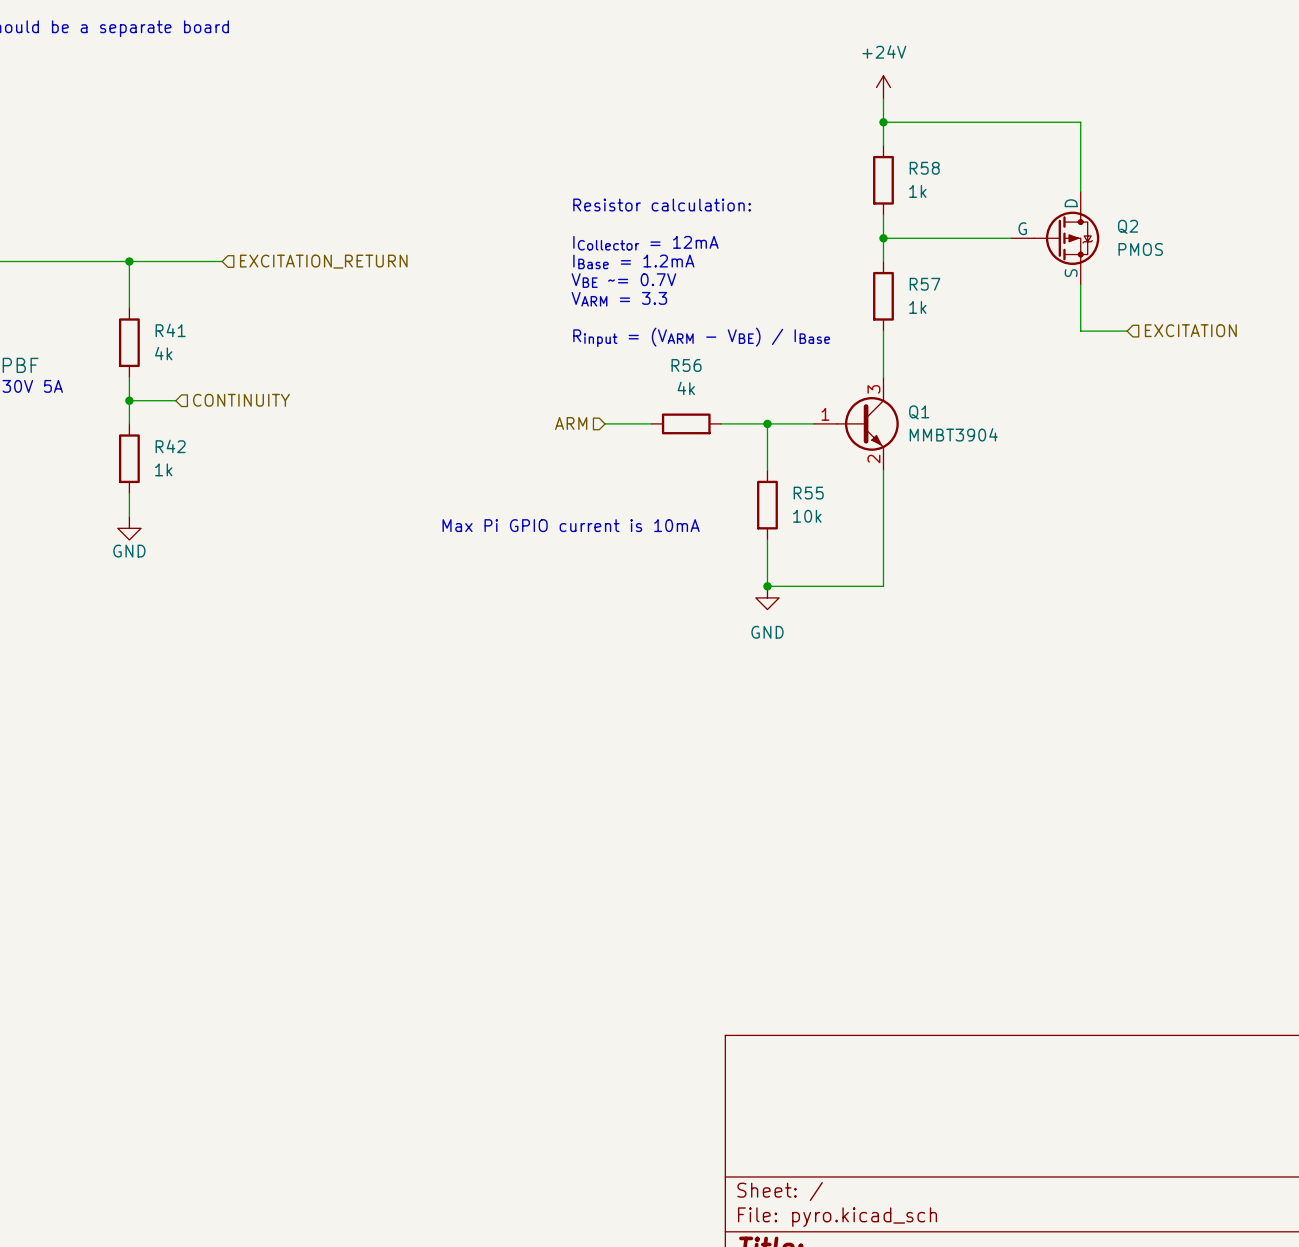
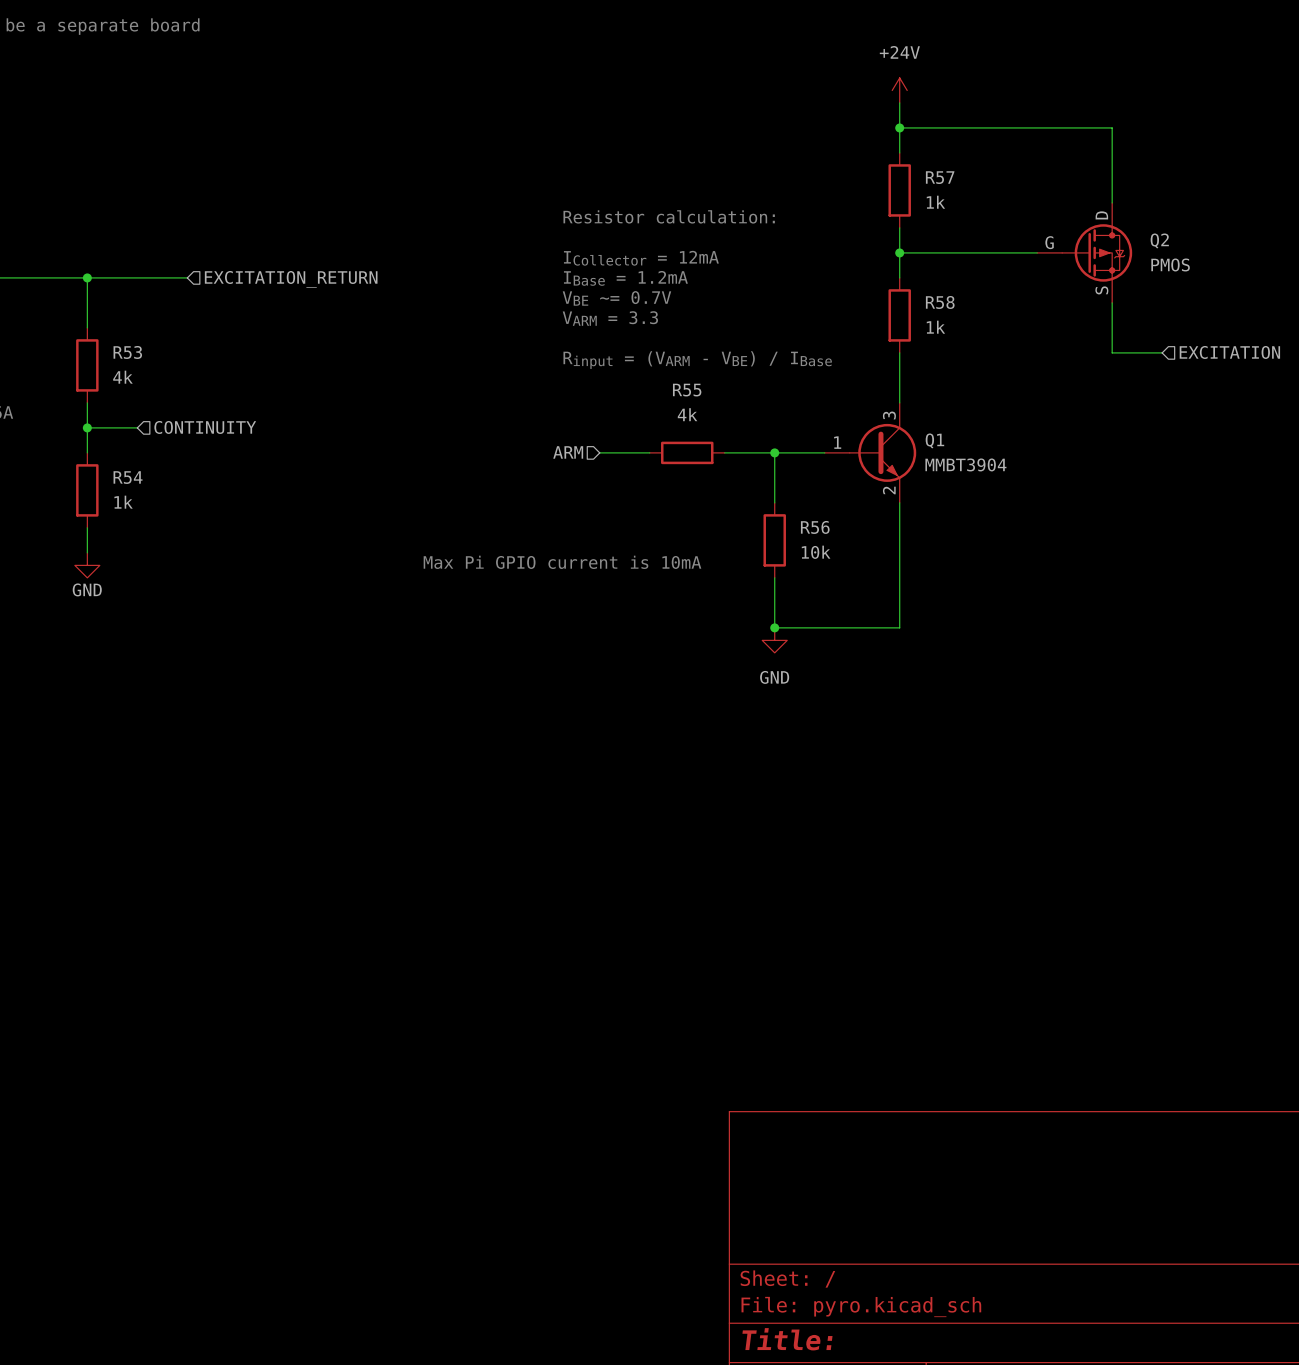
R58 name: R58 (924, 168) -> R57 (940, 177)
R57 name: R57 (925, 284) -> R58 (940, 302)
R41 name: R41 (170, 330) -> R53 (127, 352)
R56 name: R56 (686, 365) -> R55 (687, 390)
R42 name: R42 (170, 446) -> R54 (128, 477)
R55 name: R55 (808, 493) -> R56 (815, 527)

